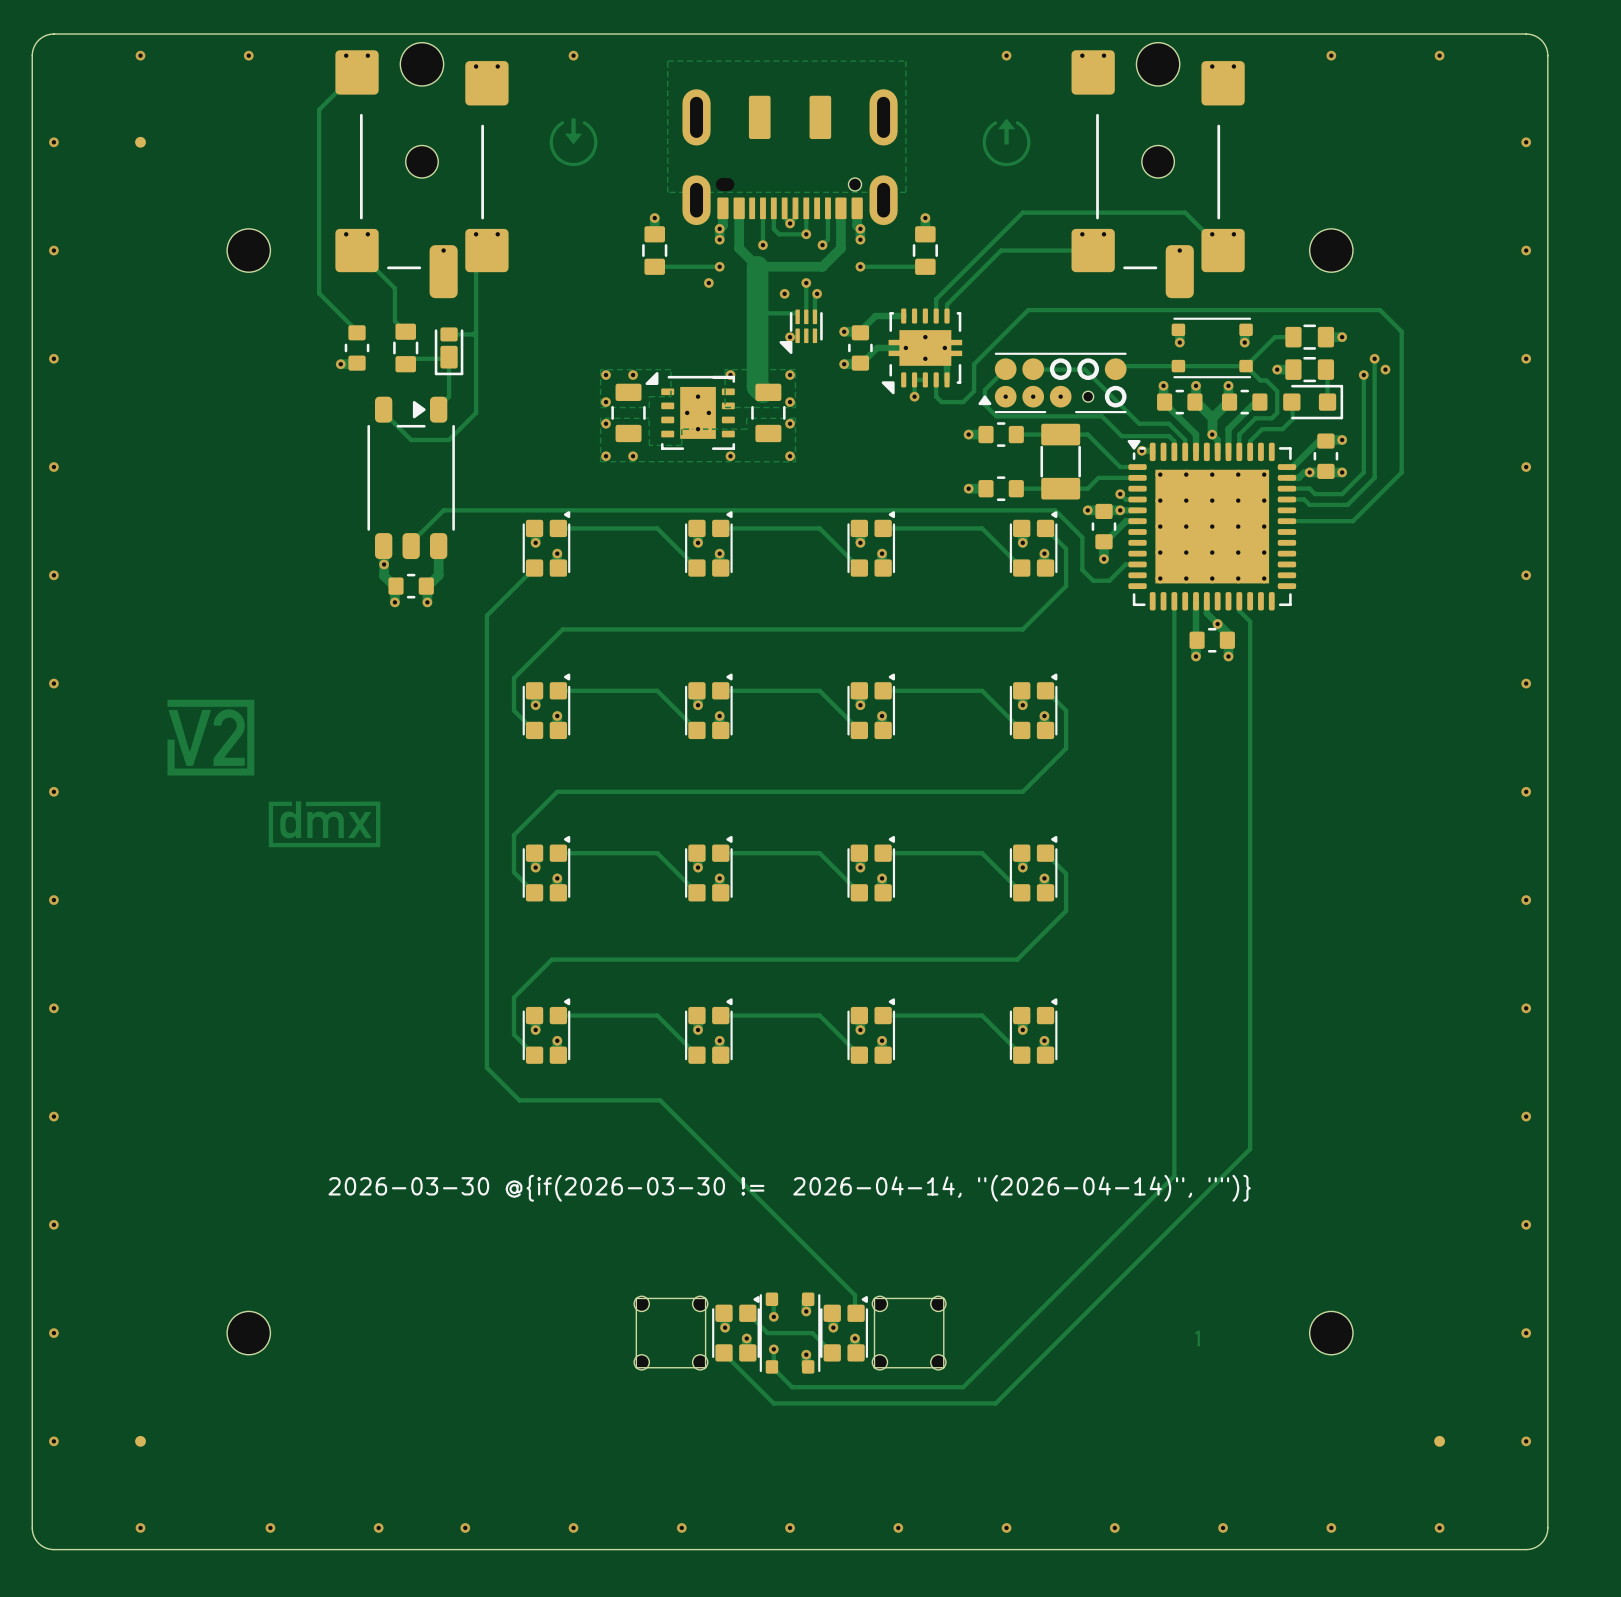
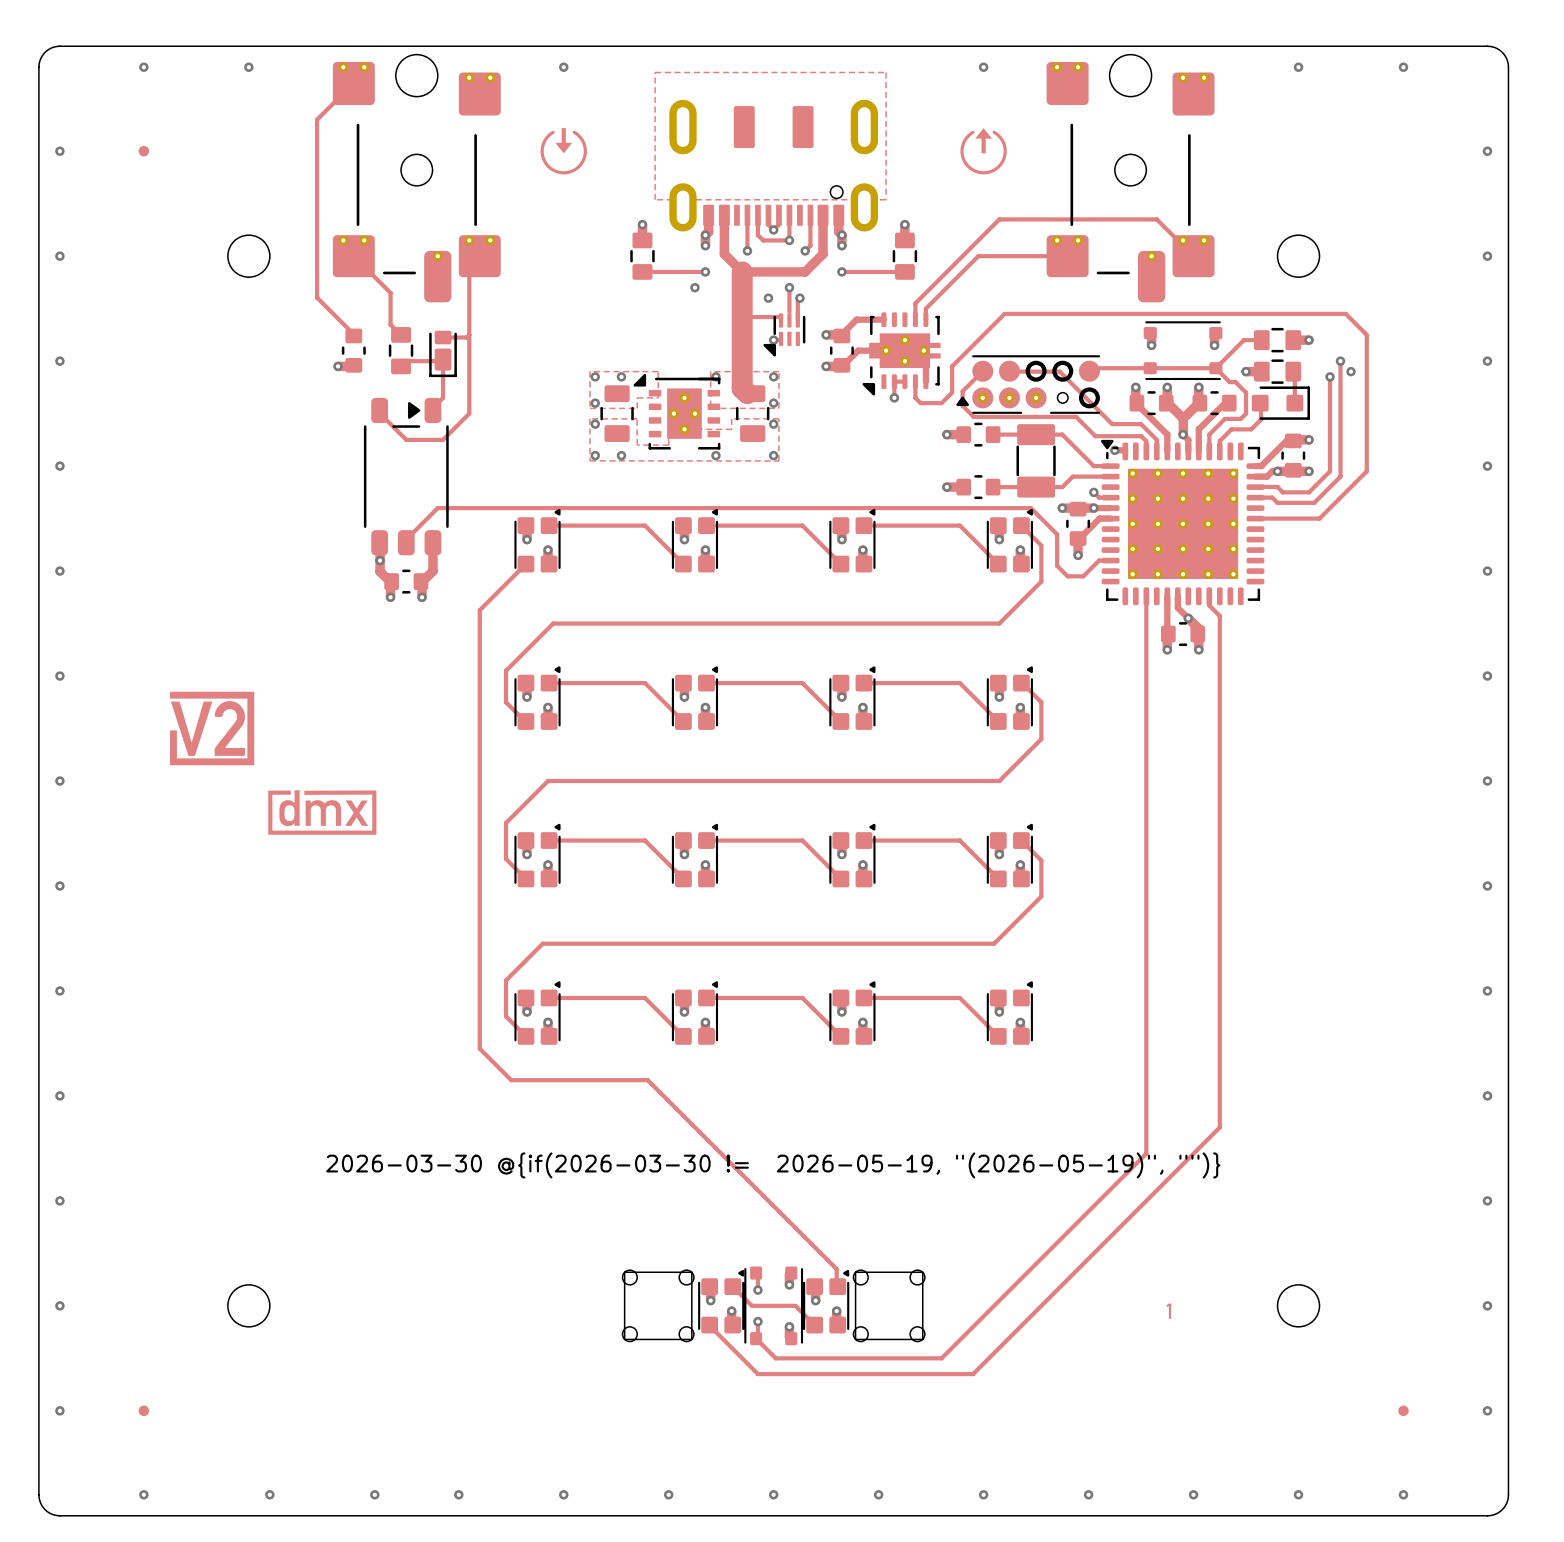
drawing shape: [328, 1174, 1251, 1202] -> [326, 1152, 1221, 1179]

